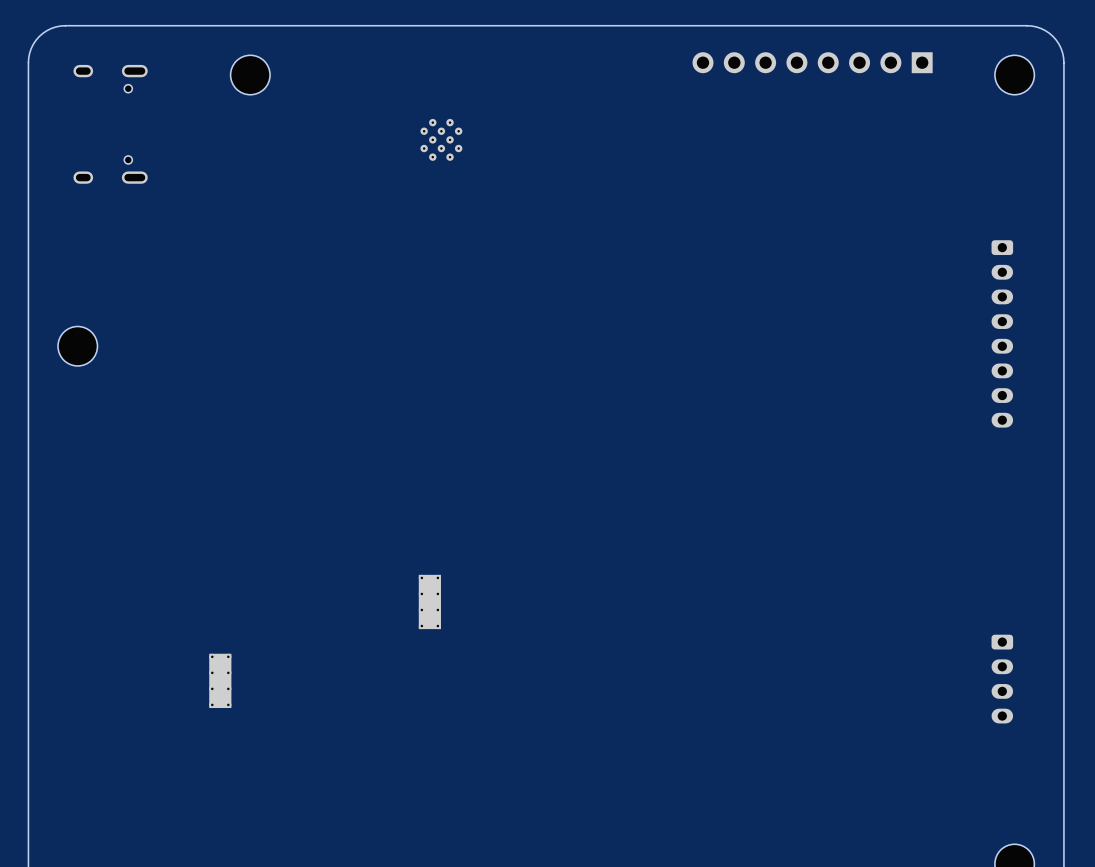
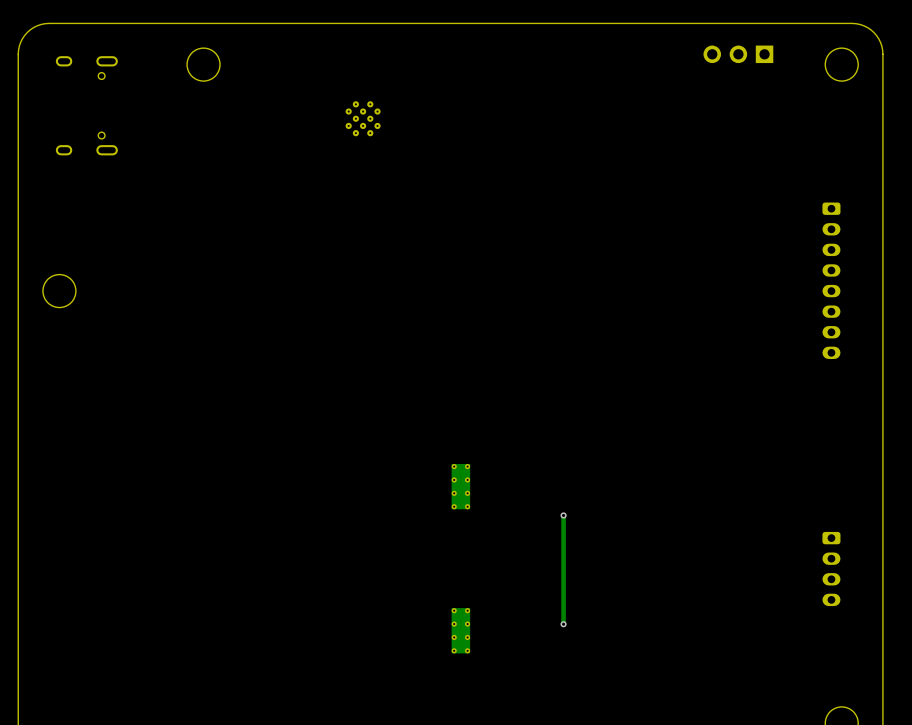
part: (812, 62) -> none
part: none -> (460, 486)
part: (429, 601) -> none
track: none -> (563, 515) (563, 624)
via: none -> (563, 515)
part: (220, 680) -> none
via: none -> (563, 624)
part: none -> (460, 630)

